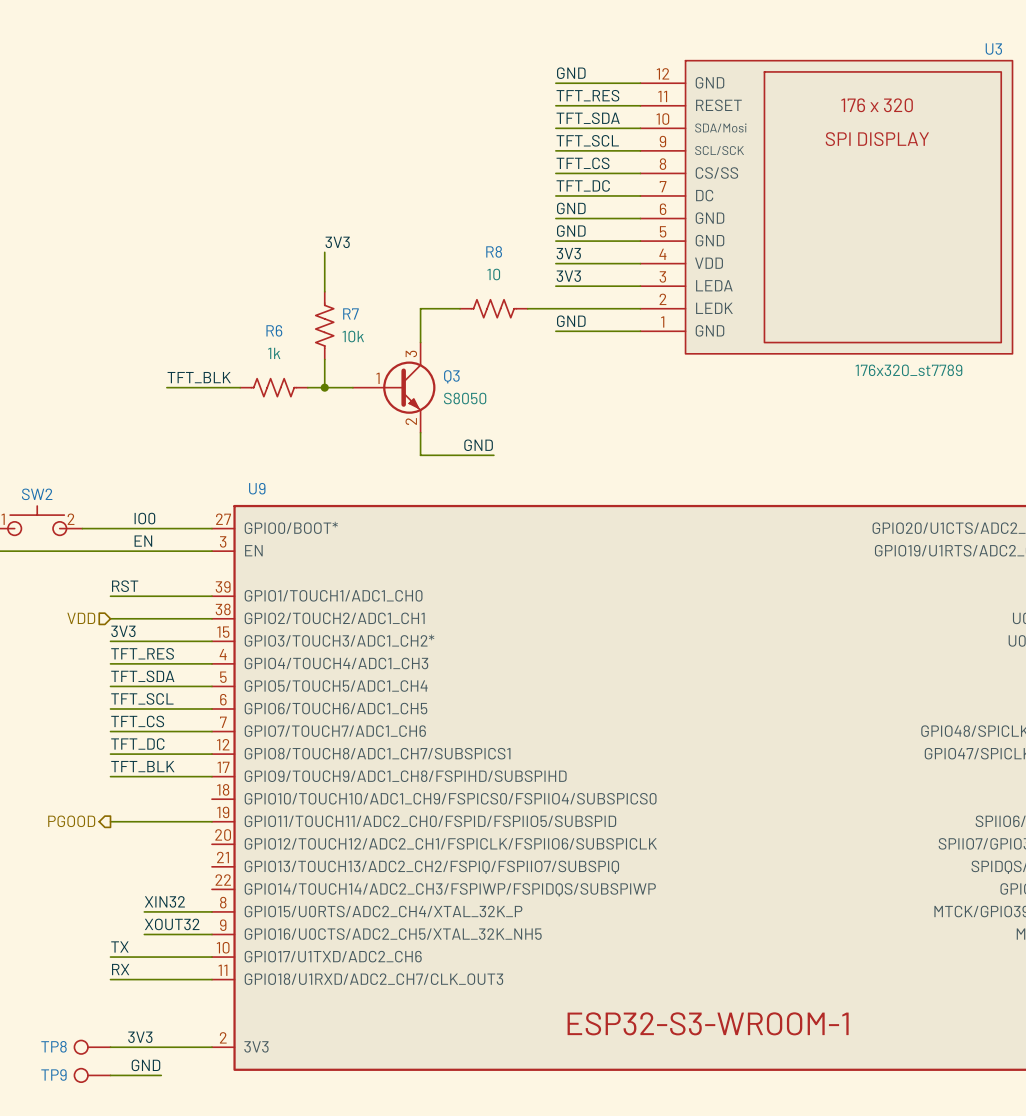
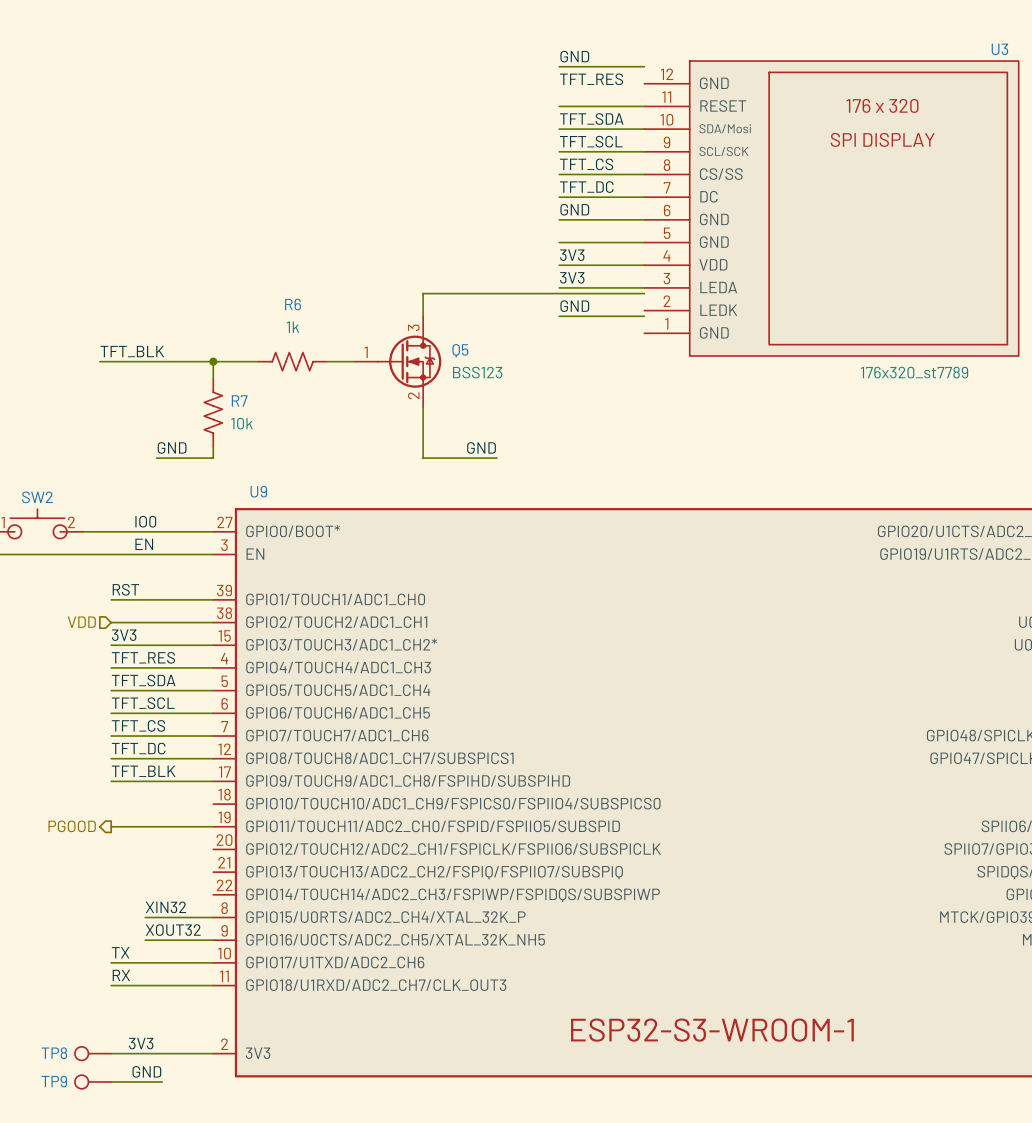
label position: GND (571, 73) -> GND (574, 56)
wire: (555, 83) (640, 83) -> (559, 66) (644, 66)
label position: TFT_RES (587, 95) -> TFT_RES (591, 79)
label: GND (571, 231) -> none
label: 3V3 (337, 242) -> none
wire: (324, 252) (324, 291) -> none
wire: (420, 308) (460, 308) -> (423, 310) (423, 293) (644, 293)
R8: 10 (493, 308) -> none
wire: (527, 308) (640, 308) -> none
label position: GND (571, 321) -> GND (574, 306)
R7 position: (324, 325) -> (213, 412)
wire: (555, 331) (640, 331) -> (559, 316) (644, 316)
wire: none -> (99, 361) (258, 361)
wire: none -> (213, 361) (213, 378)
junction: none -> (213, 361)
wire: (324, 359) (324, 387) -> (326, 361) (355, 361)
Q5: none -> BSS123 (398, 361)
label position: TFT_BLK (199, 377) -> TFT_BLK (132, 351)
wire: (166, 387) (240, 387) -> none
R6 position: (274, 387) -> (292, 361)
wire: (307, 387) (352, 387) -> none
junction: (324, 387) -> none
Q3: S8050 (394, 387) -> none
wire: none -> (213, 446) (213, 458) (156, 458)
label: none -> GND (172, 447)

